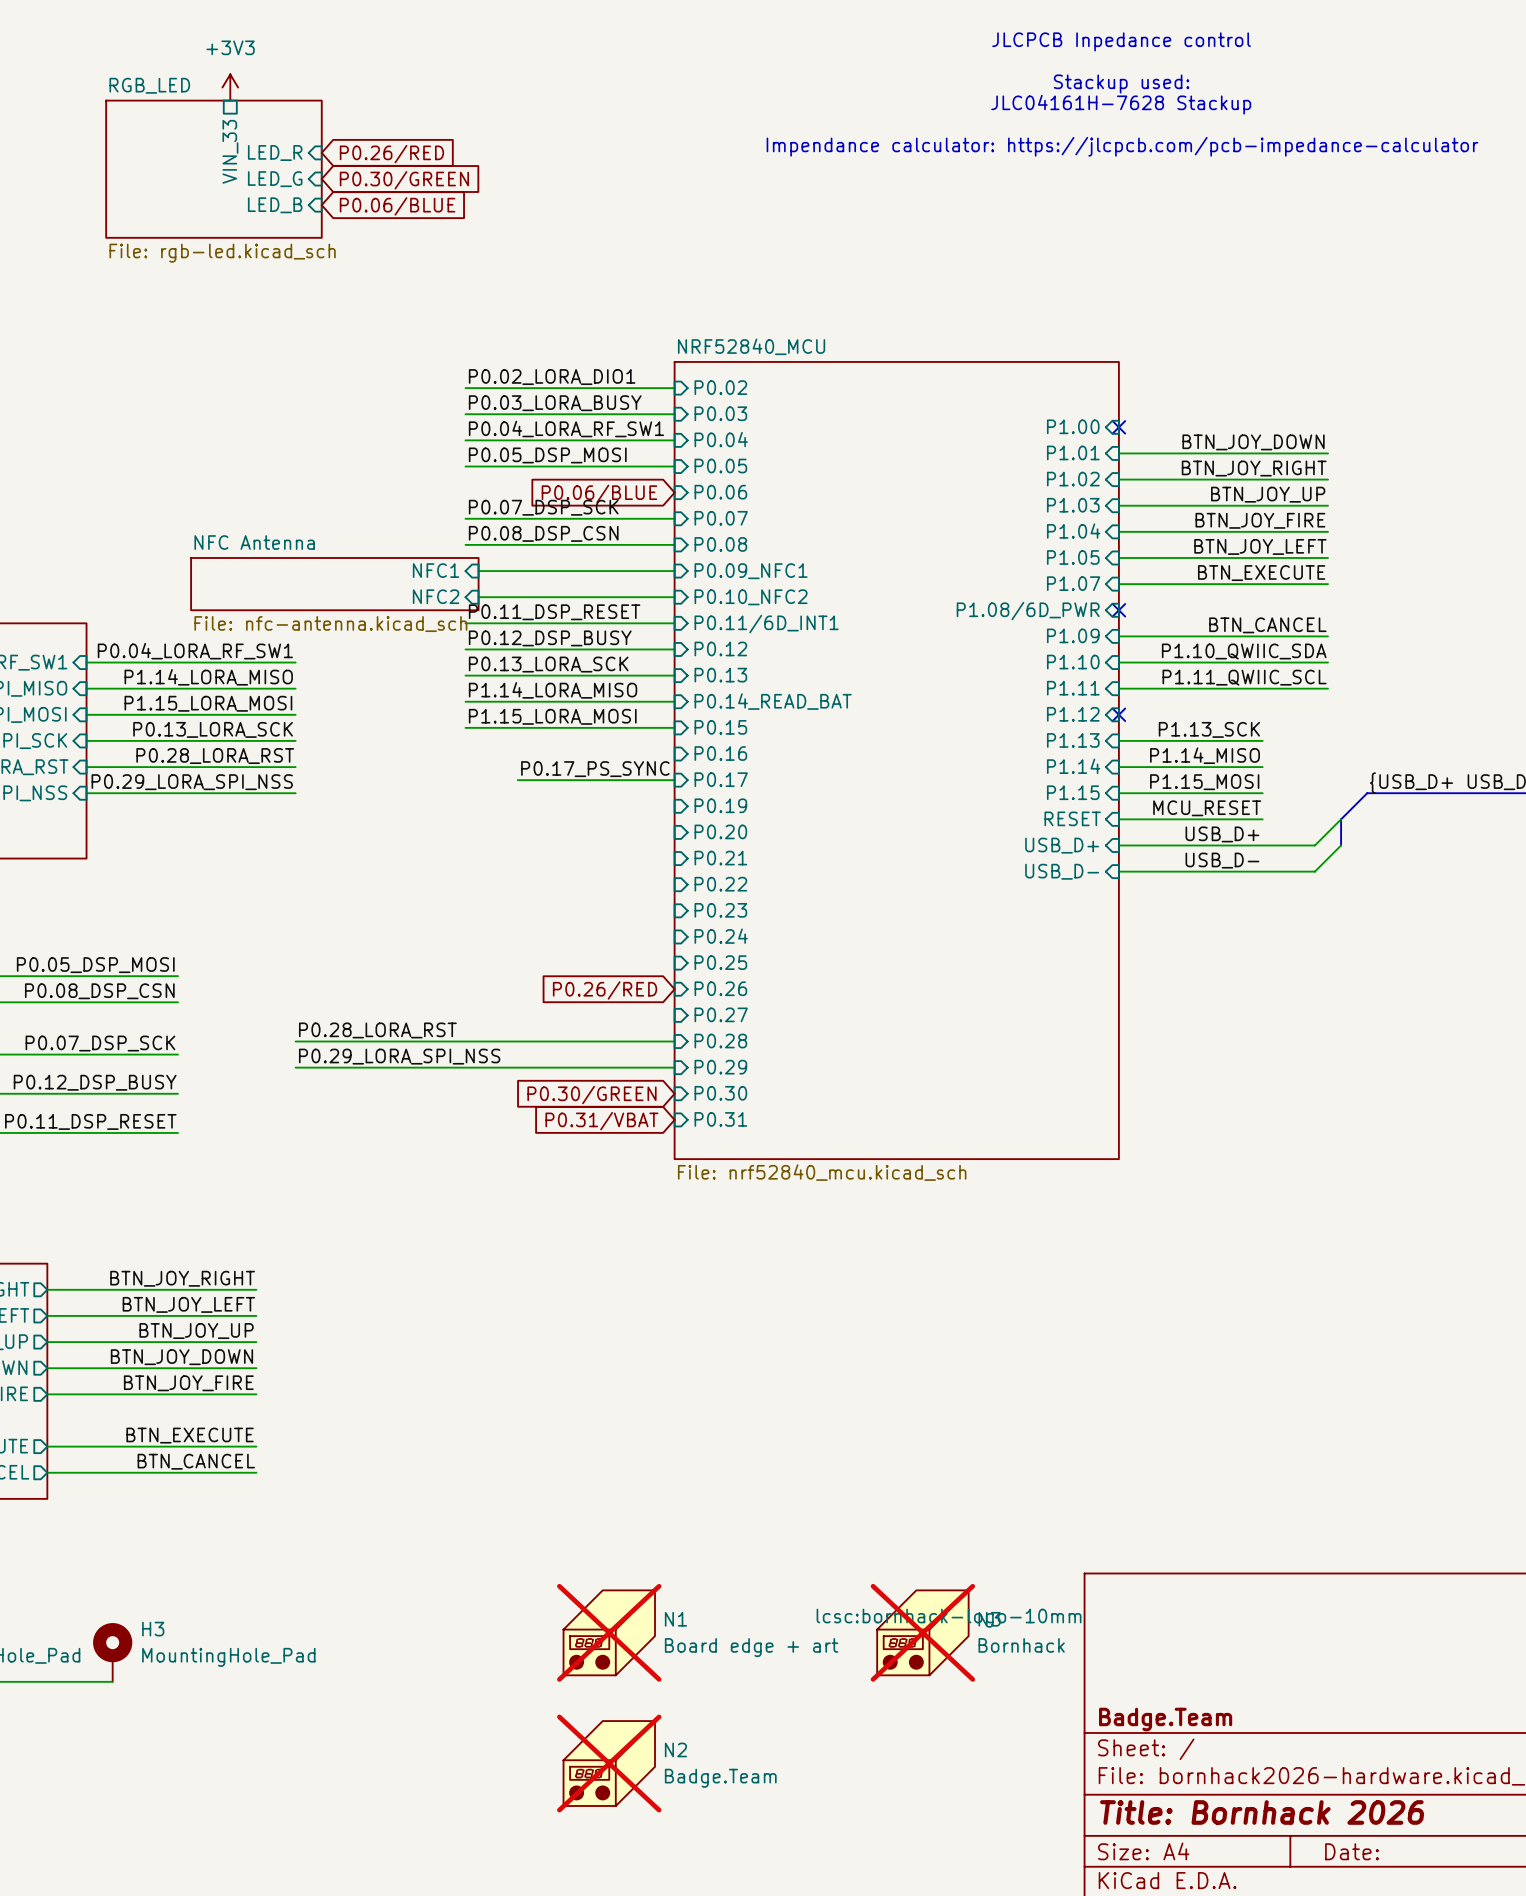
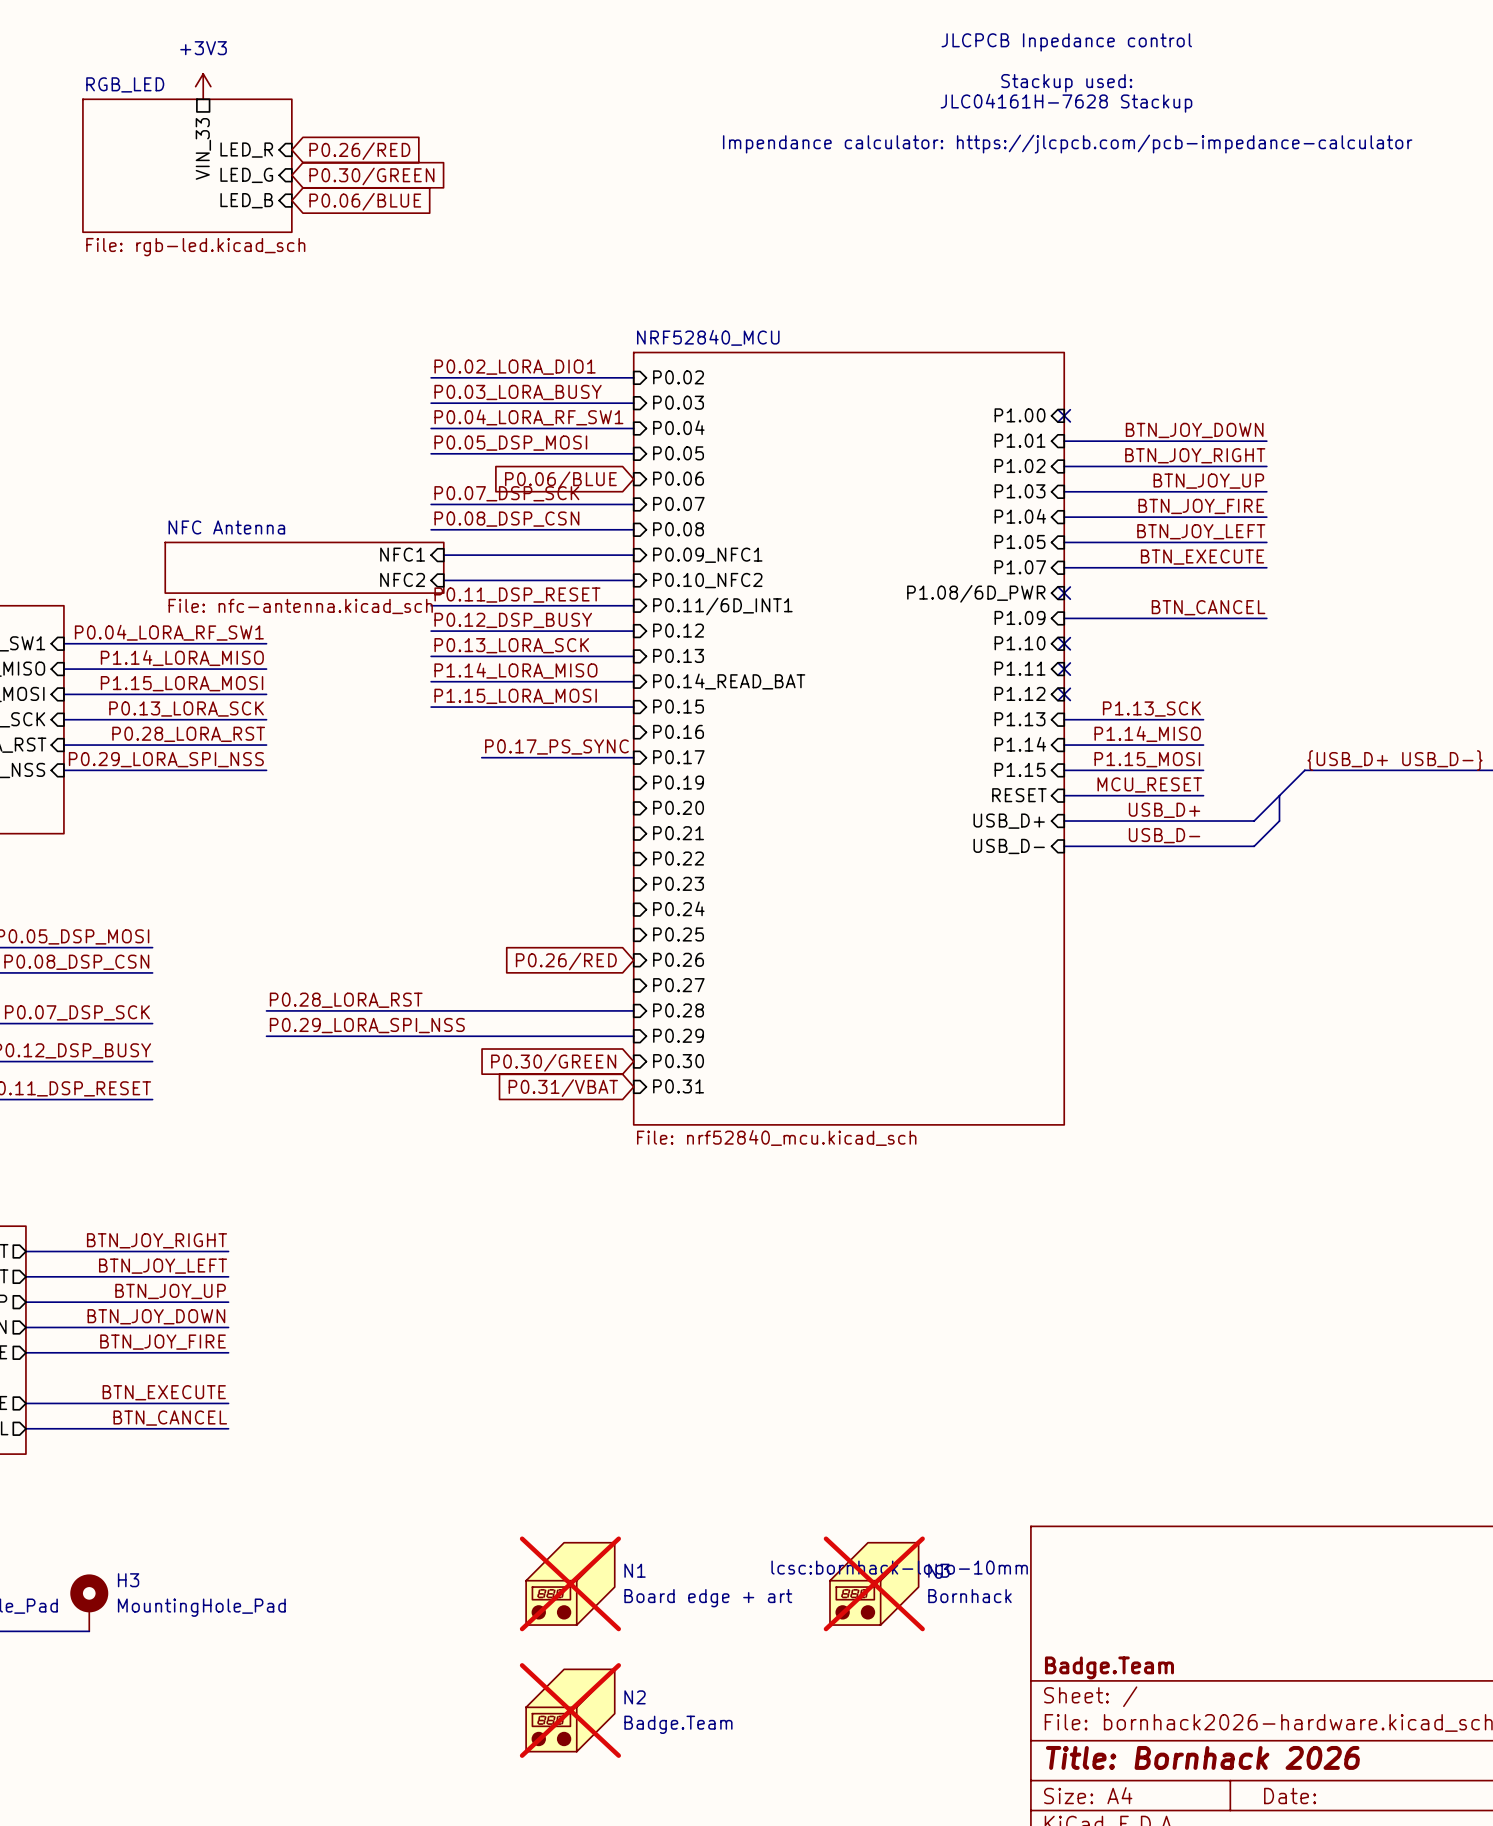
label: P1.10_QWIIC_SDA (1244, 651) -> none
wire: (1118, 662) (1328, 662) -> none
no-connect mark: none -> (1064, 643)
label: P1.11_QWIIC_SCL (1244, 677) -> none
wire: (1118, 688) (1328, 688) -> none
no-connect mark: none -> (1064, 669)

